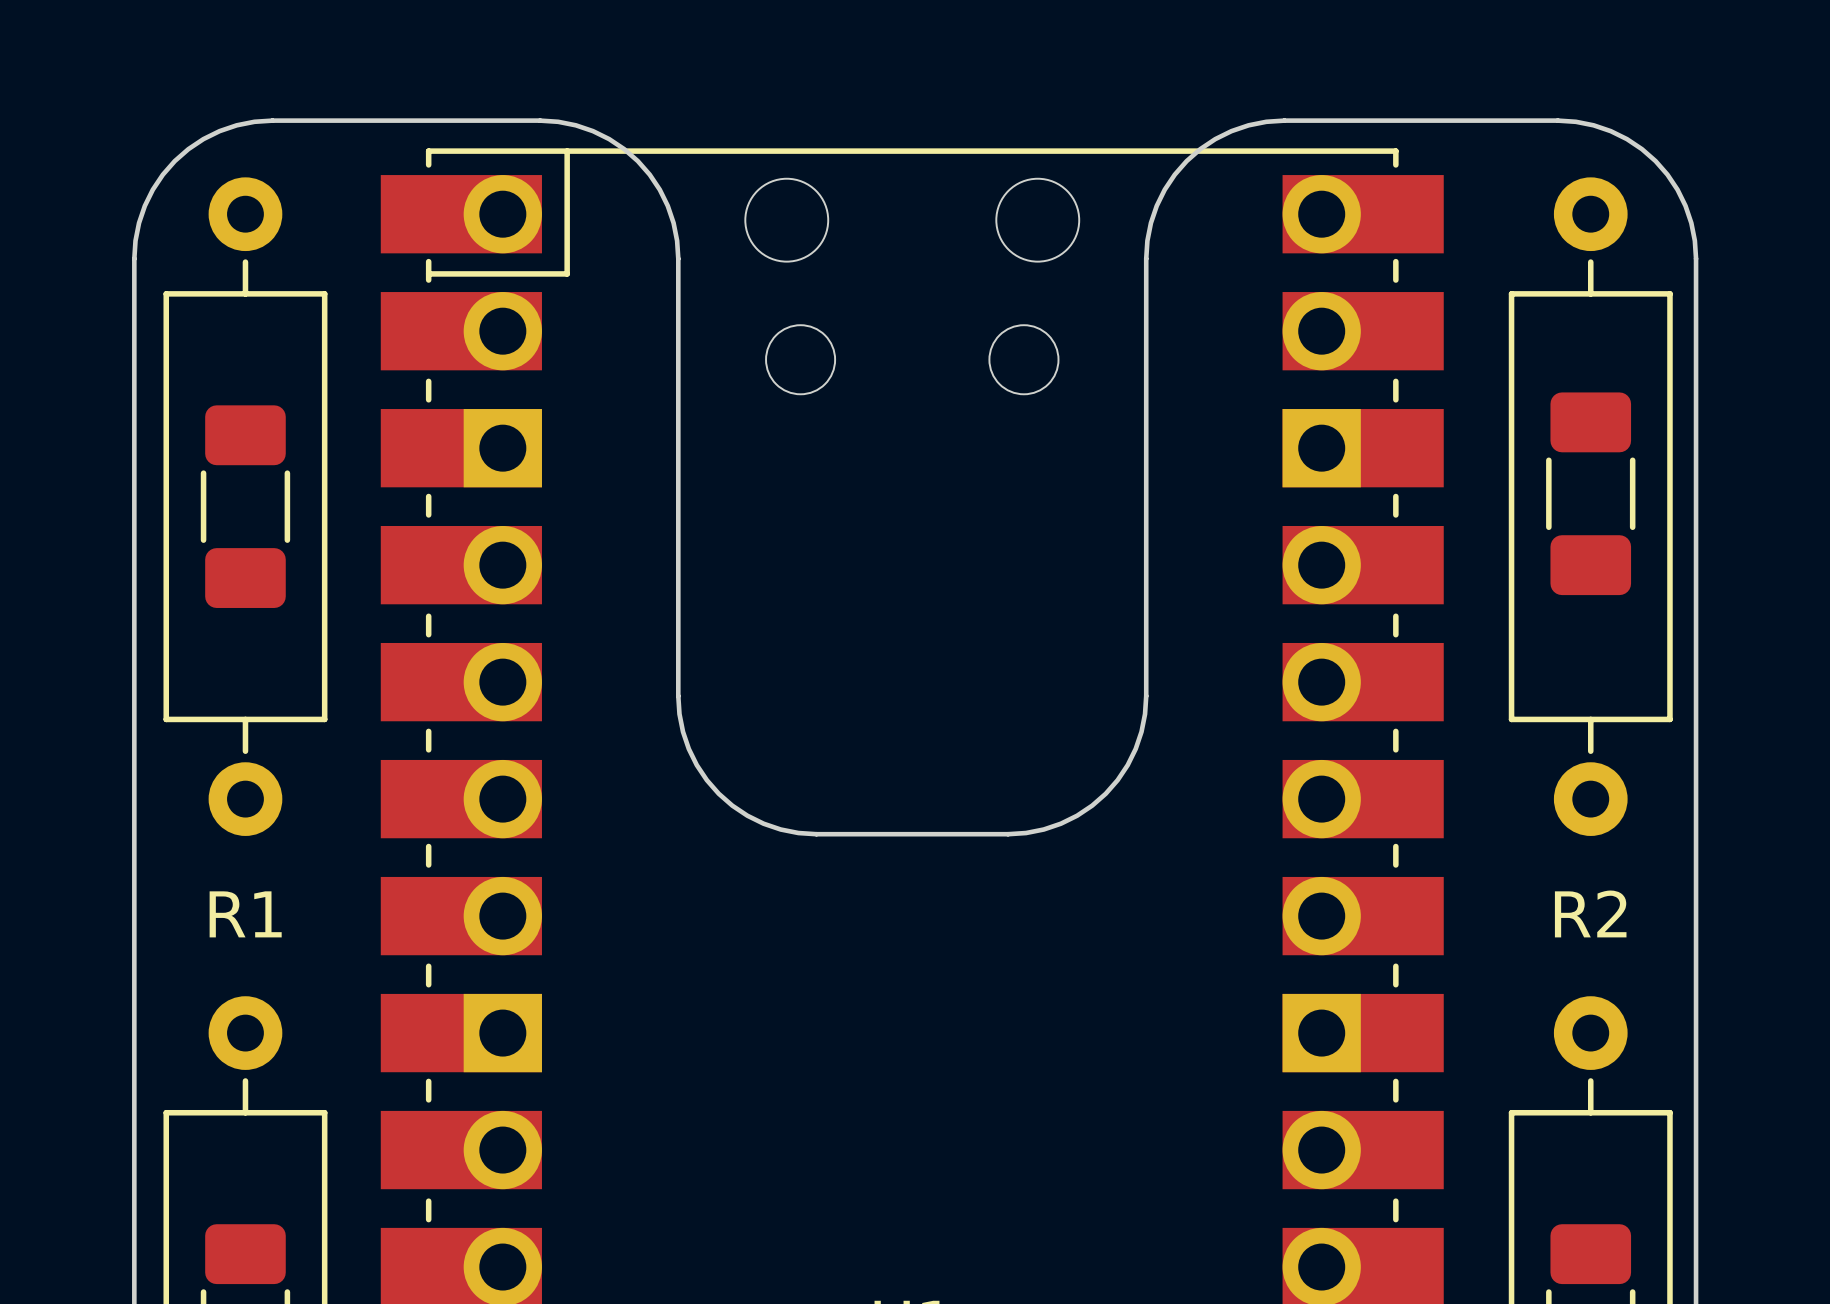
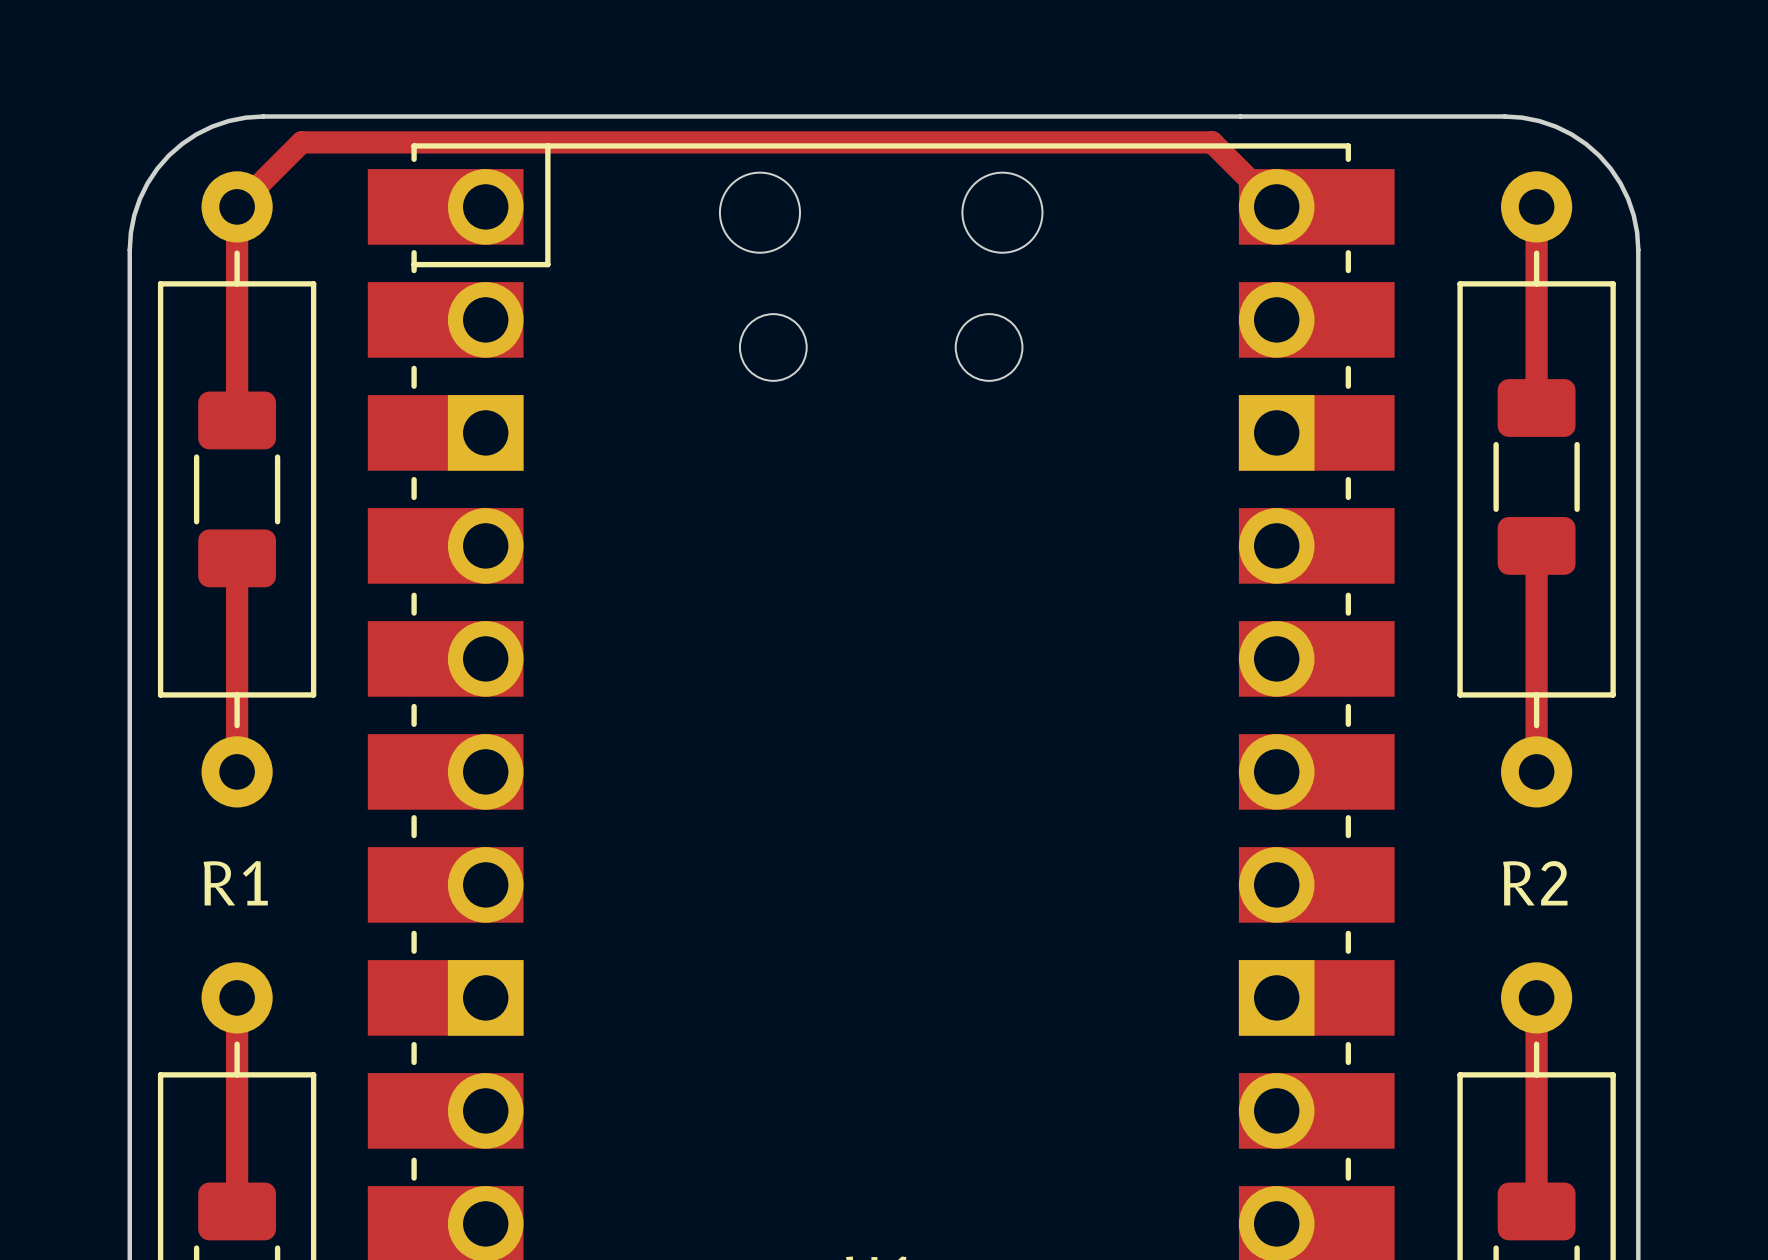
board edge: (540, 120) (558, 121) (593, 131) (624, 149) (649, 174) (667, 205) (677, 240) (678, 258) (678, 696) (683, 731) (688, 748) (706, 780) (732, 805) (763, 823) (798, 833) (816, 834) (1008, 834) (1043, 829) (1077, 815) (1092, 805) (1105, 793) (1127, 765) (1141, 731) (1146, 696) (1146, 258) (1150, 223) (1164, 189) (1186, 161) (1200, 149) (1215, 139) (1248, 125) (1284, 120) -> (521, 116) (1240, 116)
track: none -> (1276, 206) (1212, 142) (301, 142) (237, 206) (237, 420)
track: none -> (1536, 206) (1536, 407)
track: none -> (1536, 545) (1536, 771)
track: none -> (237, 558) (237, 771)
track: none -> (237, 997) (237, 1211)
track: none -> (1536, 997) (1536, 1211)

